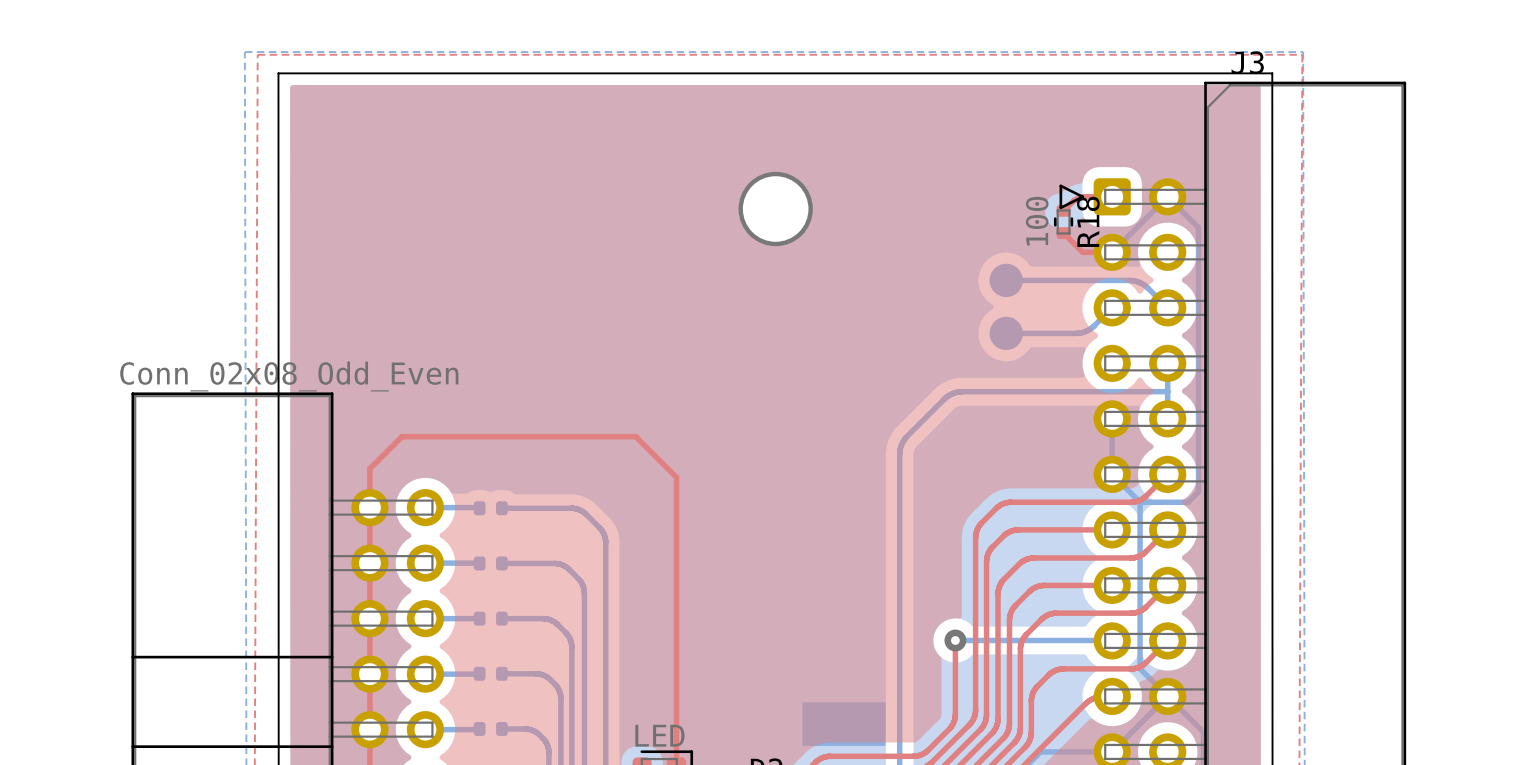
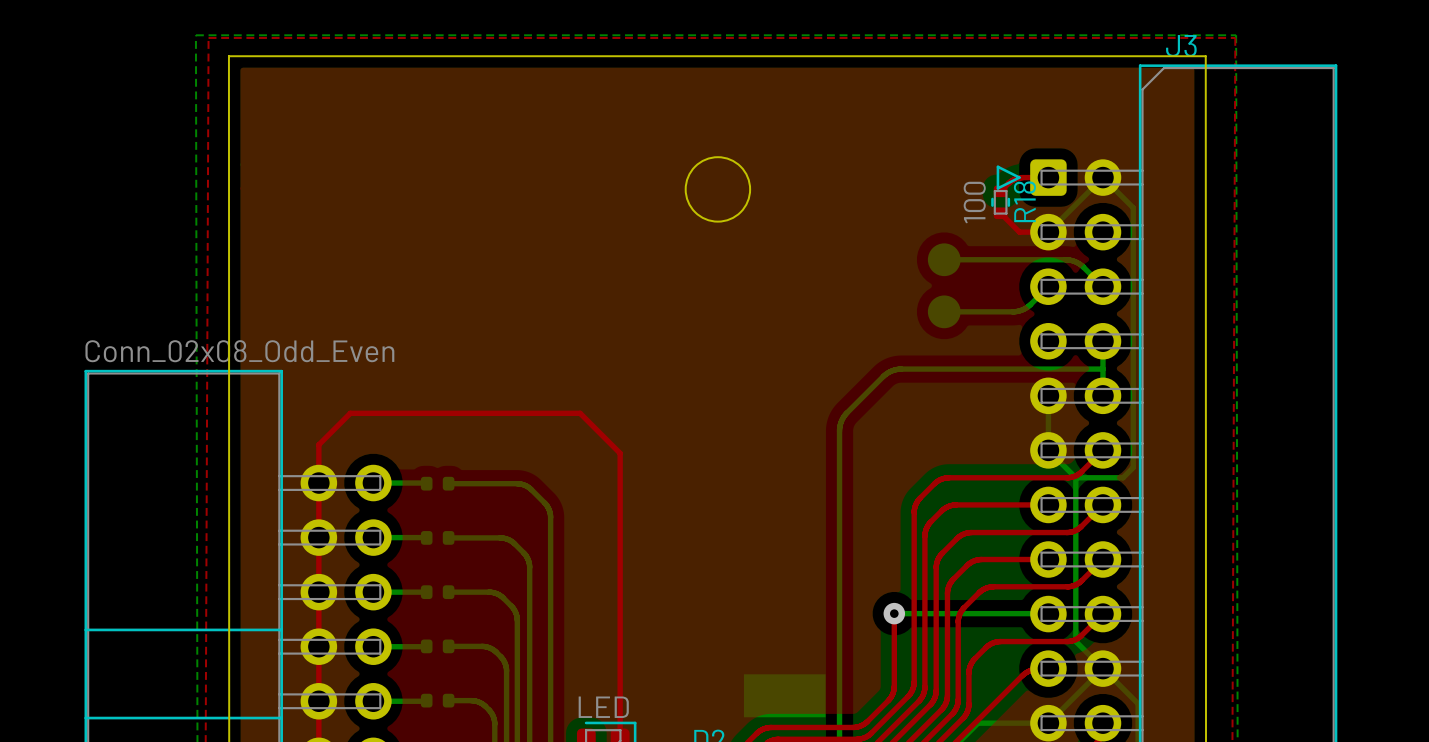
round board edge: none -> [685, 156, 751, 223]
via: (775, 209) -> none

